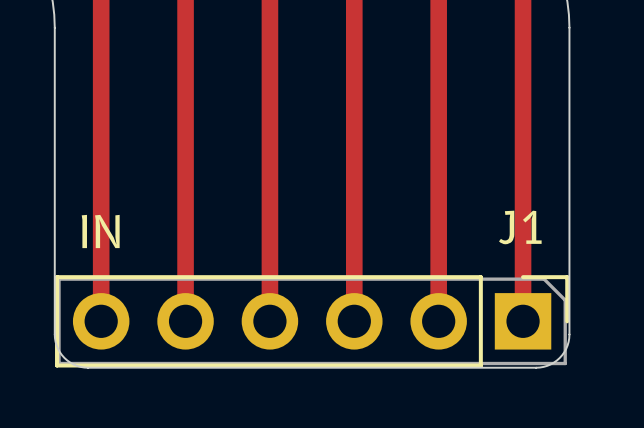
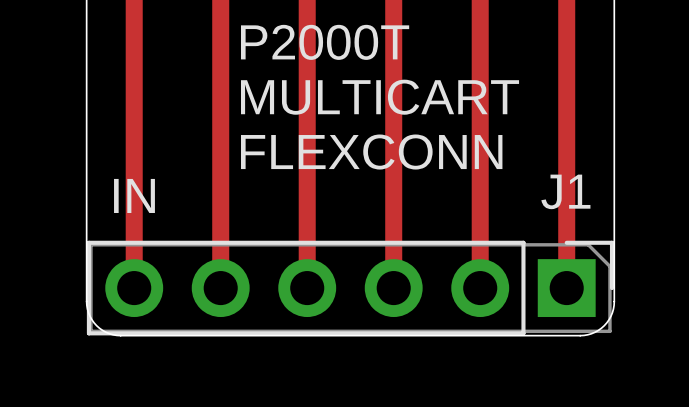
text: none -> P2000T (325, 42)
text: none -> MULTICART (380, 97)
text: none -> FLEXCONN (371, 152)

